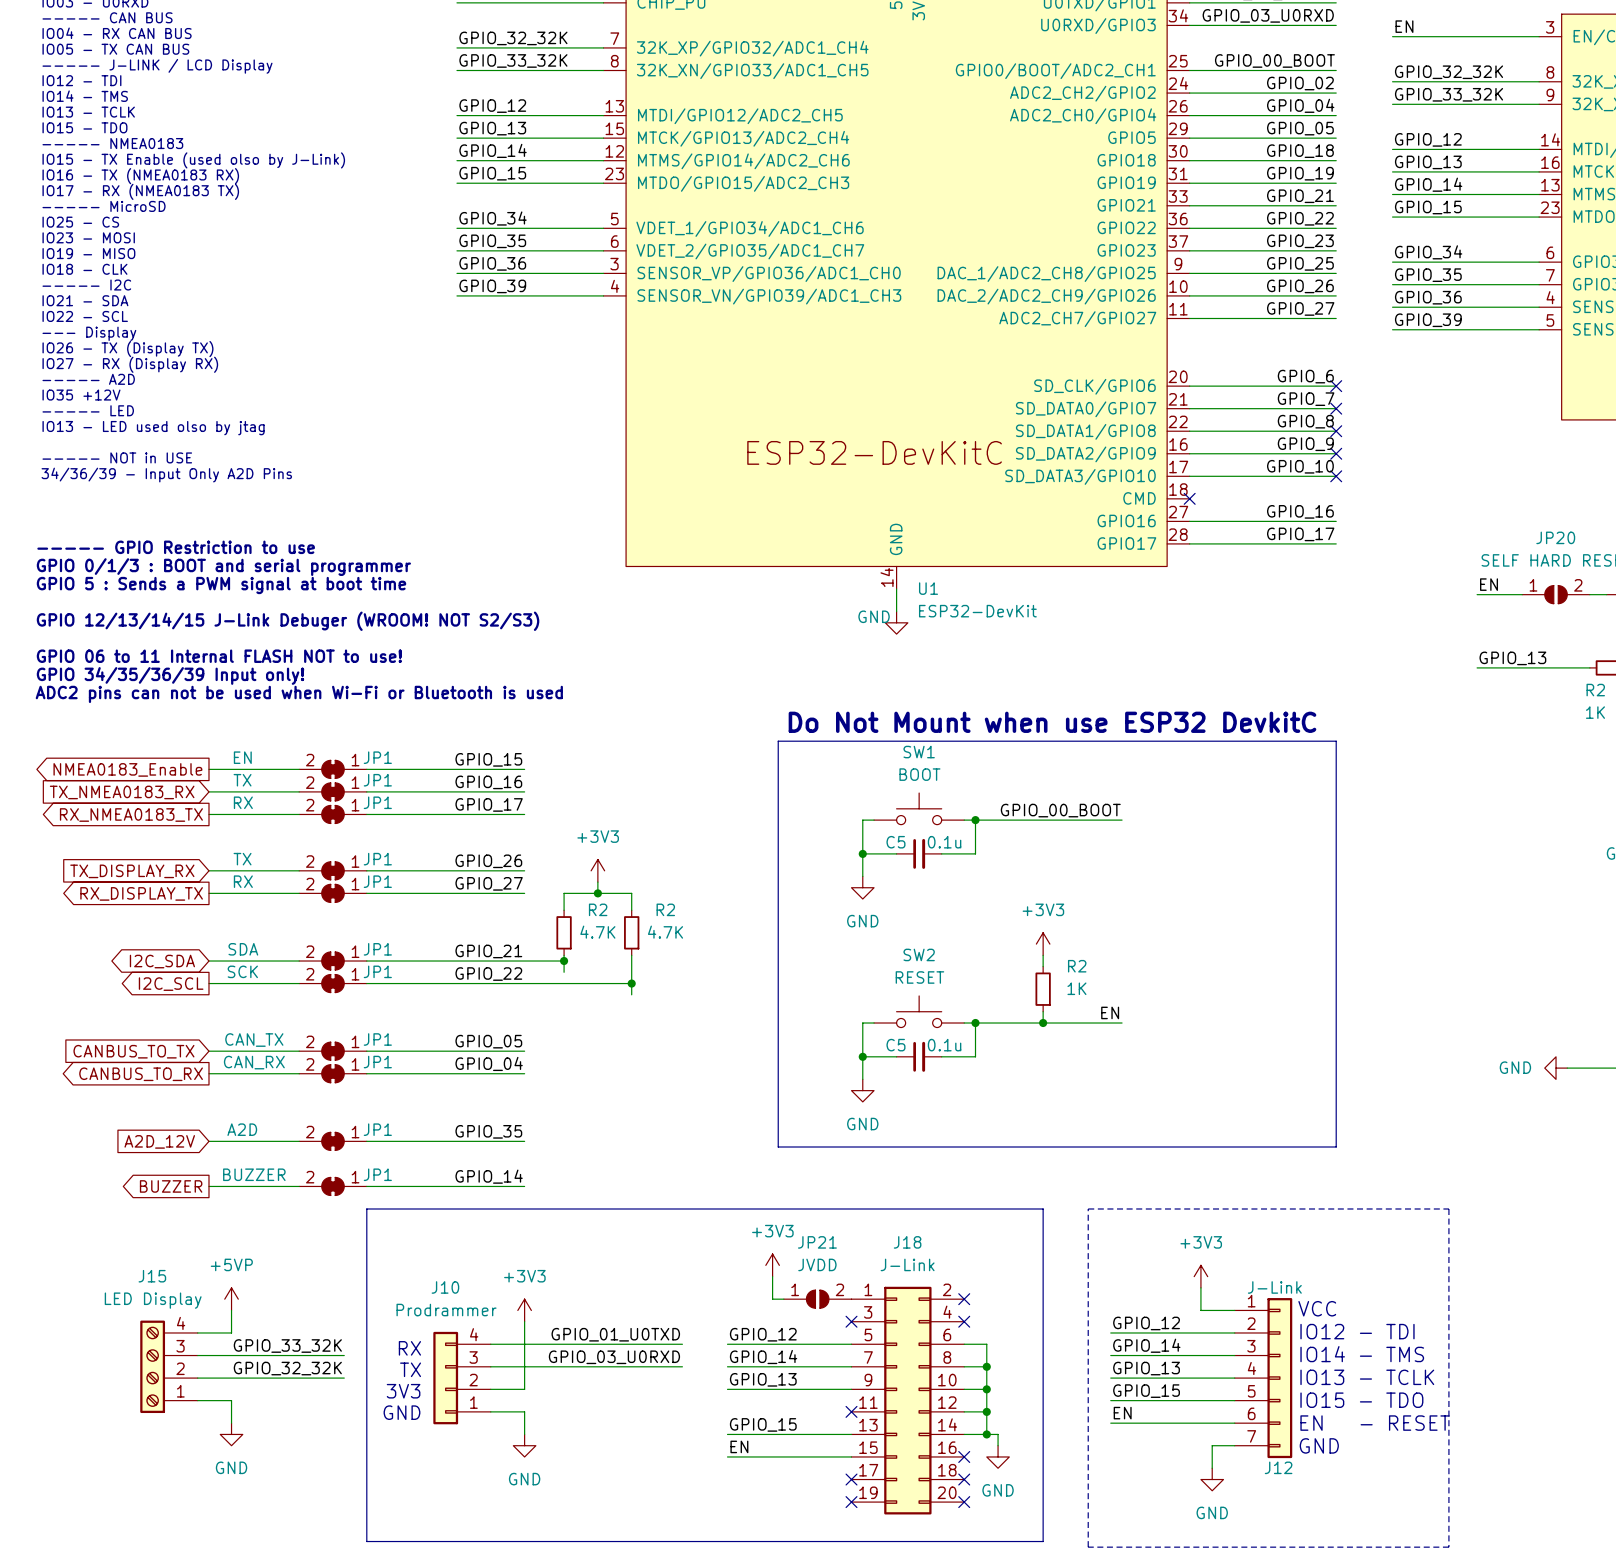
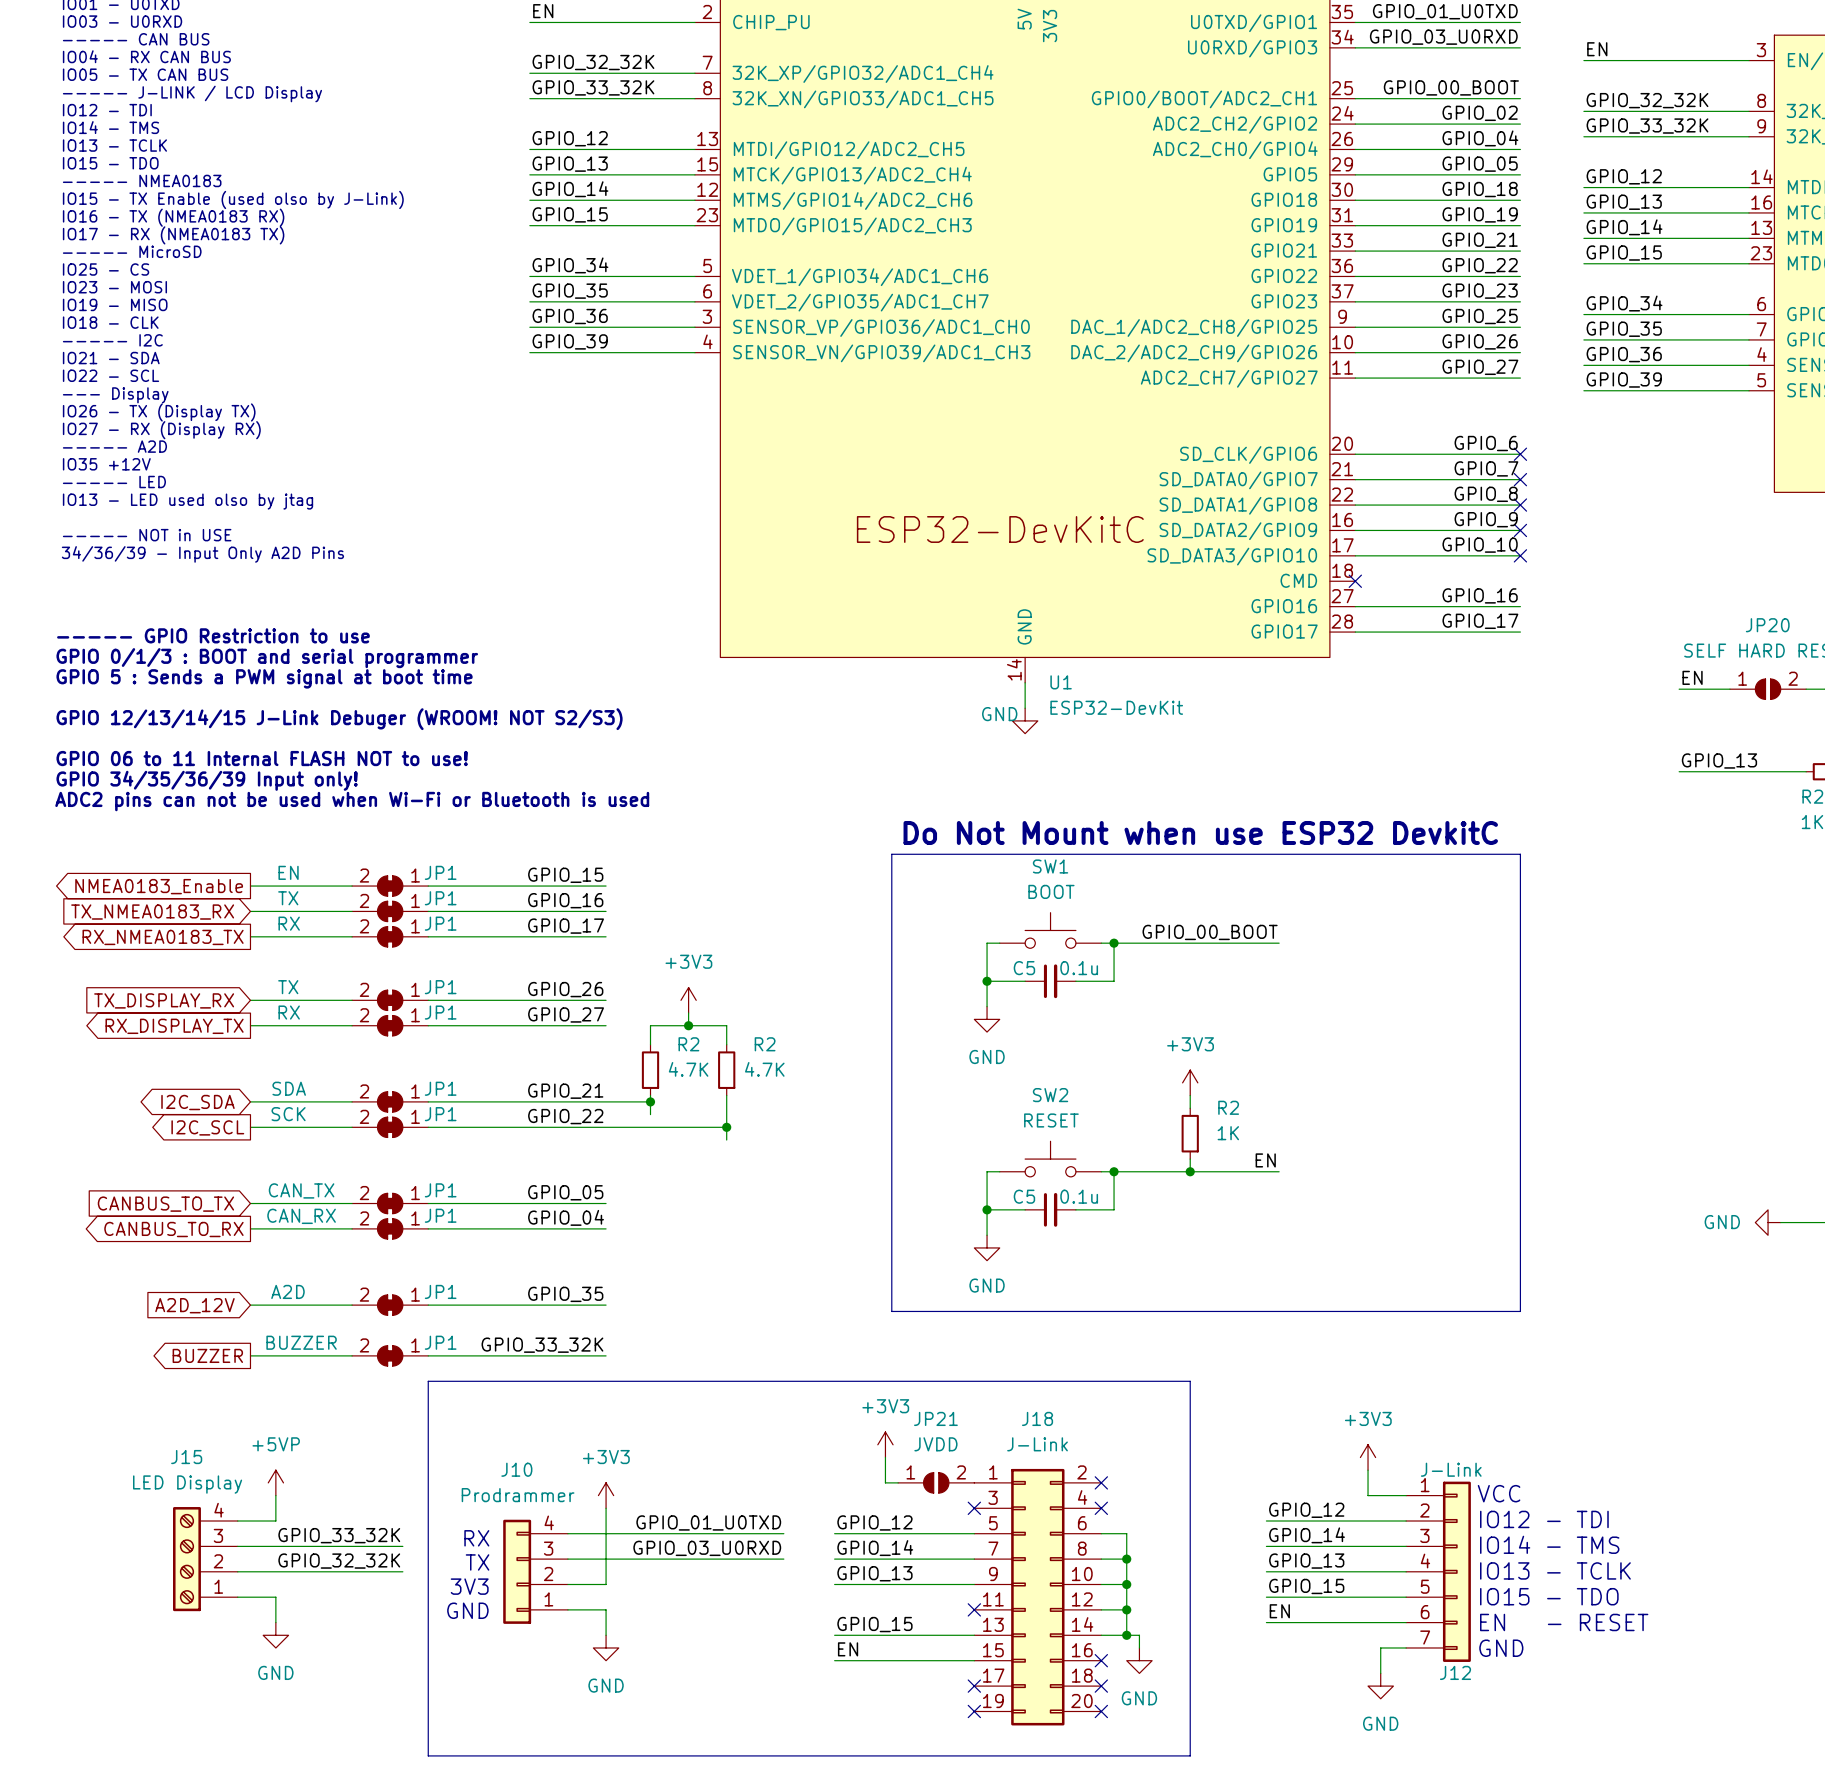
label: GPIO_14 (489, 1176) -> GPIO_33_32K (542, 1345)
line: (1088, 1208) (1448, 1208) (1448, 1547) (1088, 1547) (1088, 1208) -> none

